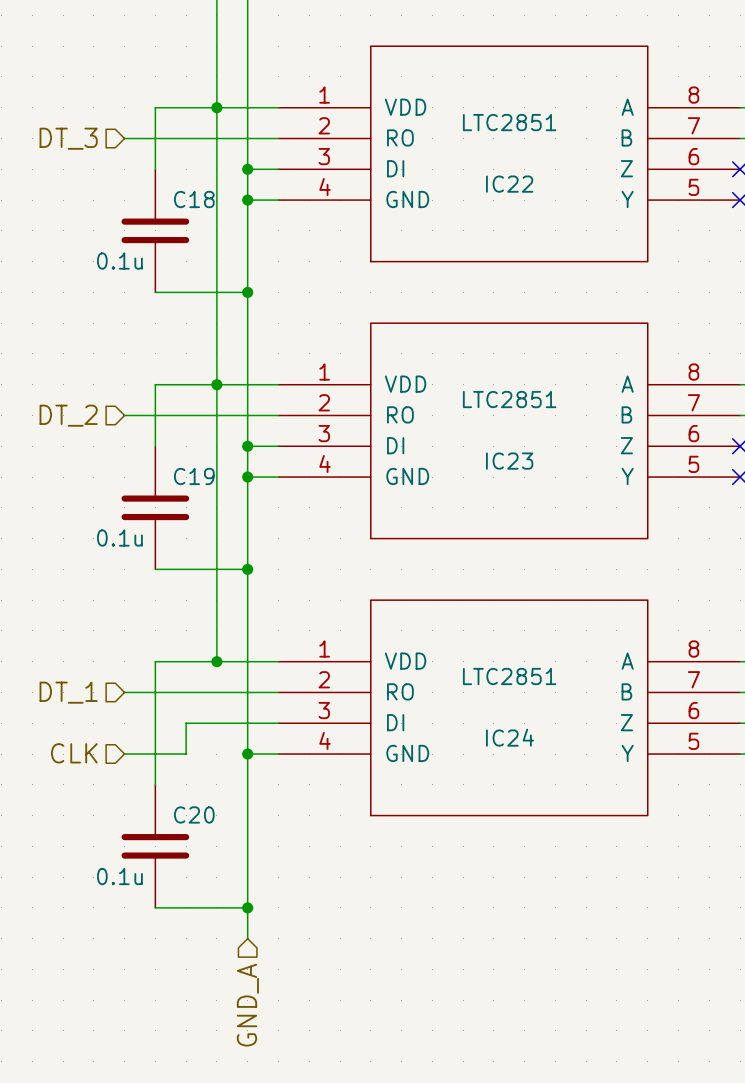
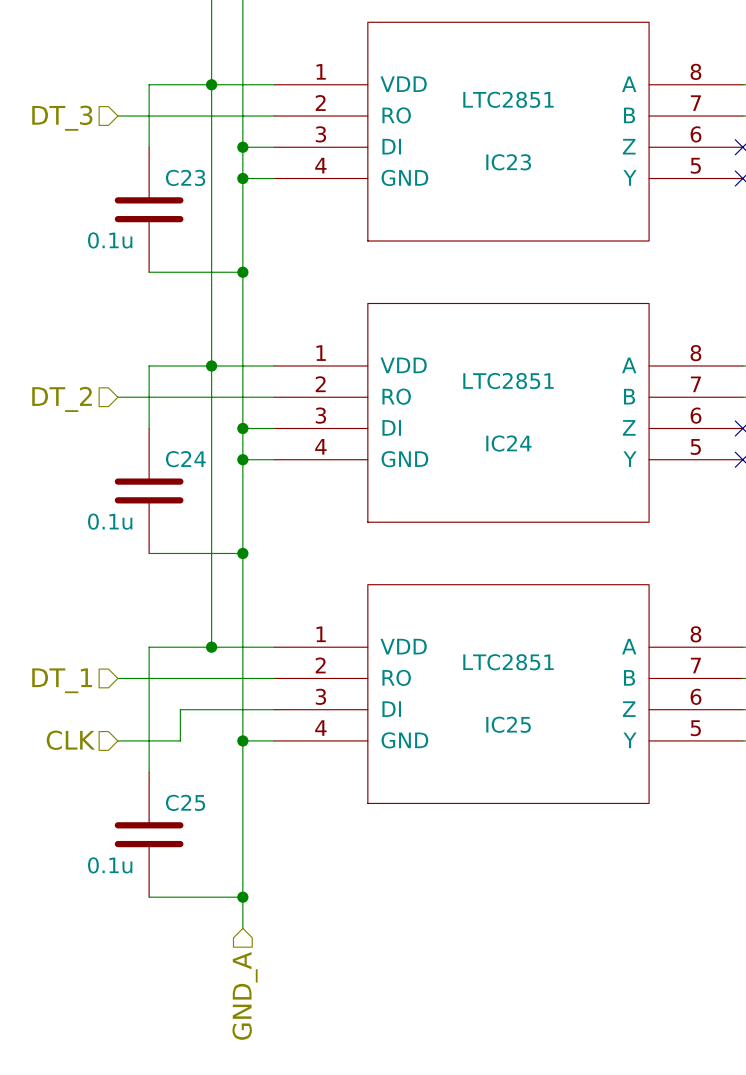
IC22 name: IC22 (509, 184) -> IC23 (508, 162)
C18 name: C18 (194, 199) -> C23 (185, 177)
IC23 name: IC23 (509, 461) -> IC24 (508, 443)
C19 name: C19 (194, 476) -> C24 (185, 459)
IC24 name: IC24 (509, 737) -> IC25 (508, 724)
C20 name: C20 (194, 814) -> C25 (185, 802)

